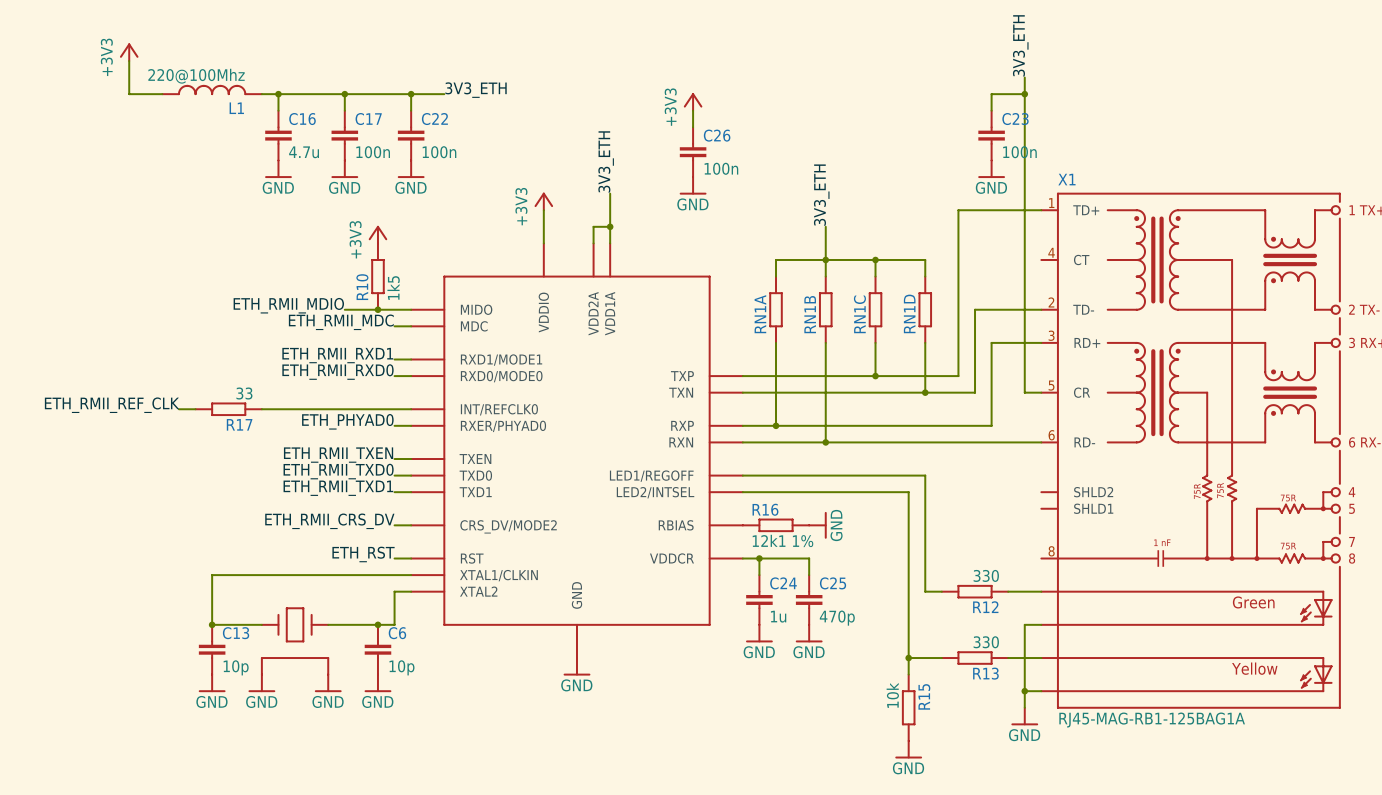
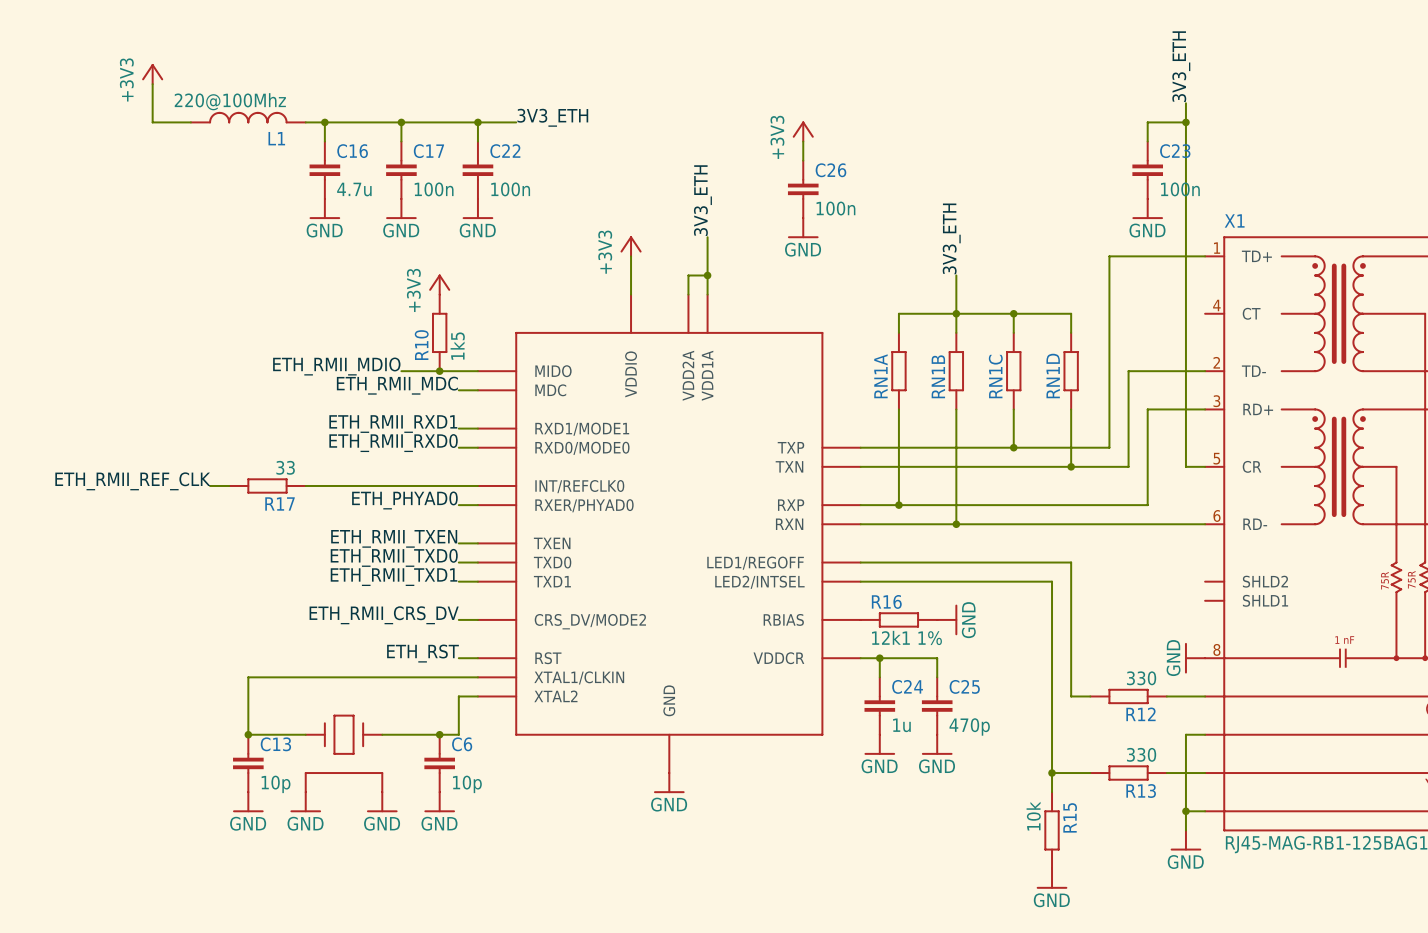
power symbol: none -> GND (1195, 658)

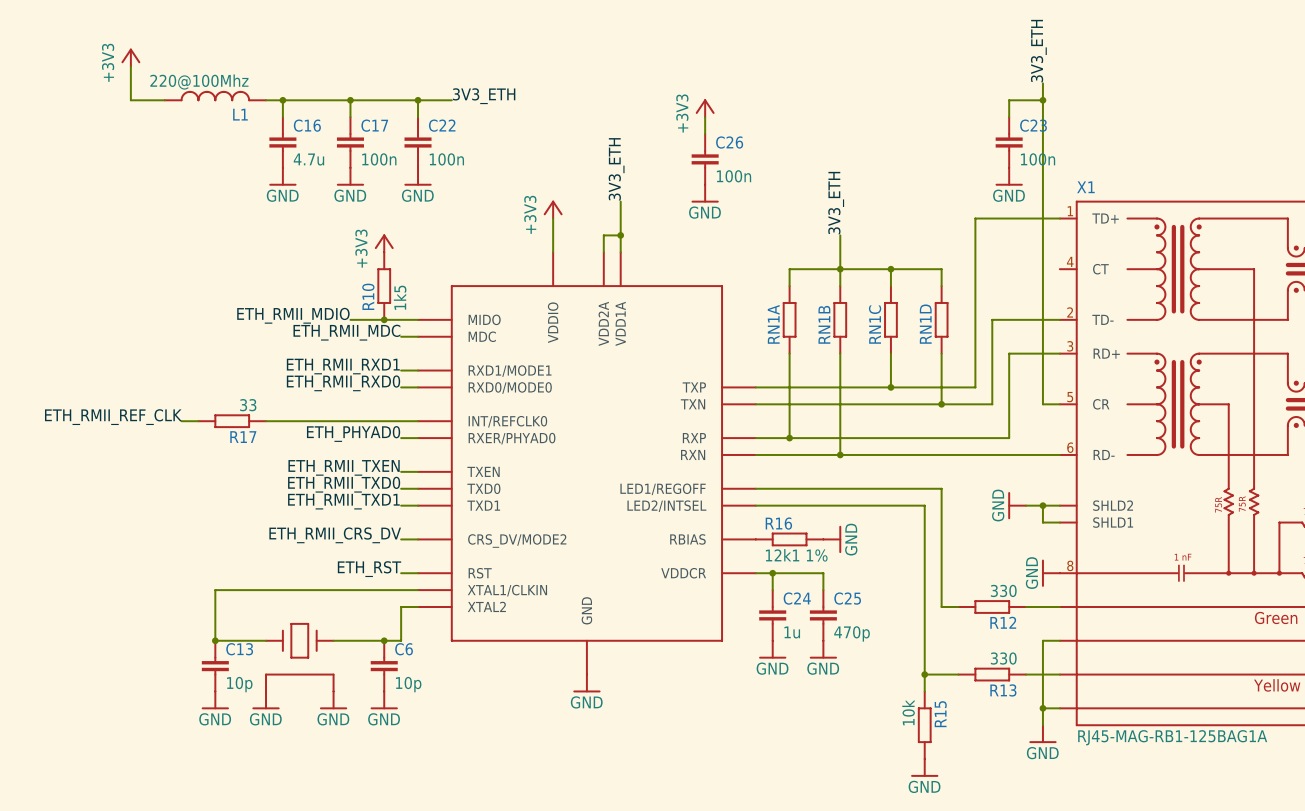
power symbol: none -> GND (1017, 505)
wire: none -> (1026, 505) (1059, 505)
wire: none -> (1042, 505) (1042, 522) (1059, 522)
junction: none -> (1042, 505)

